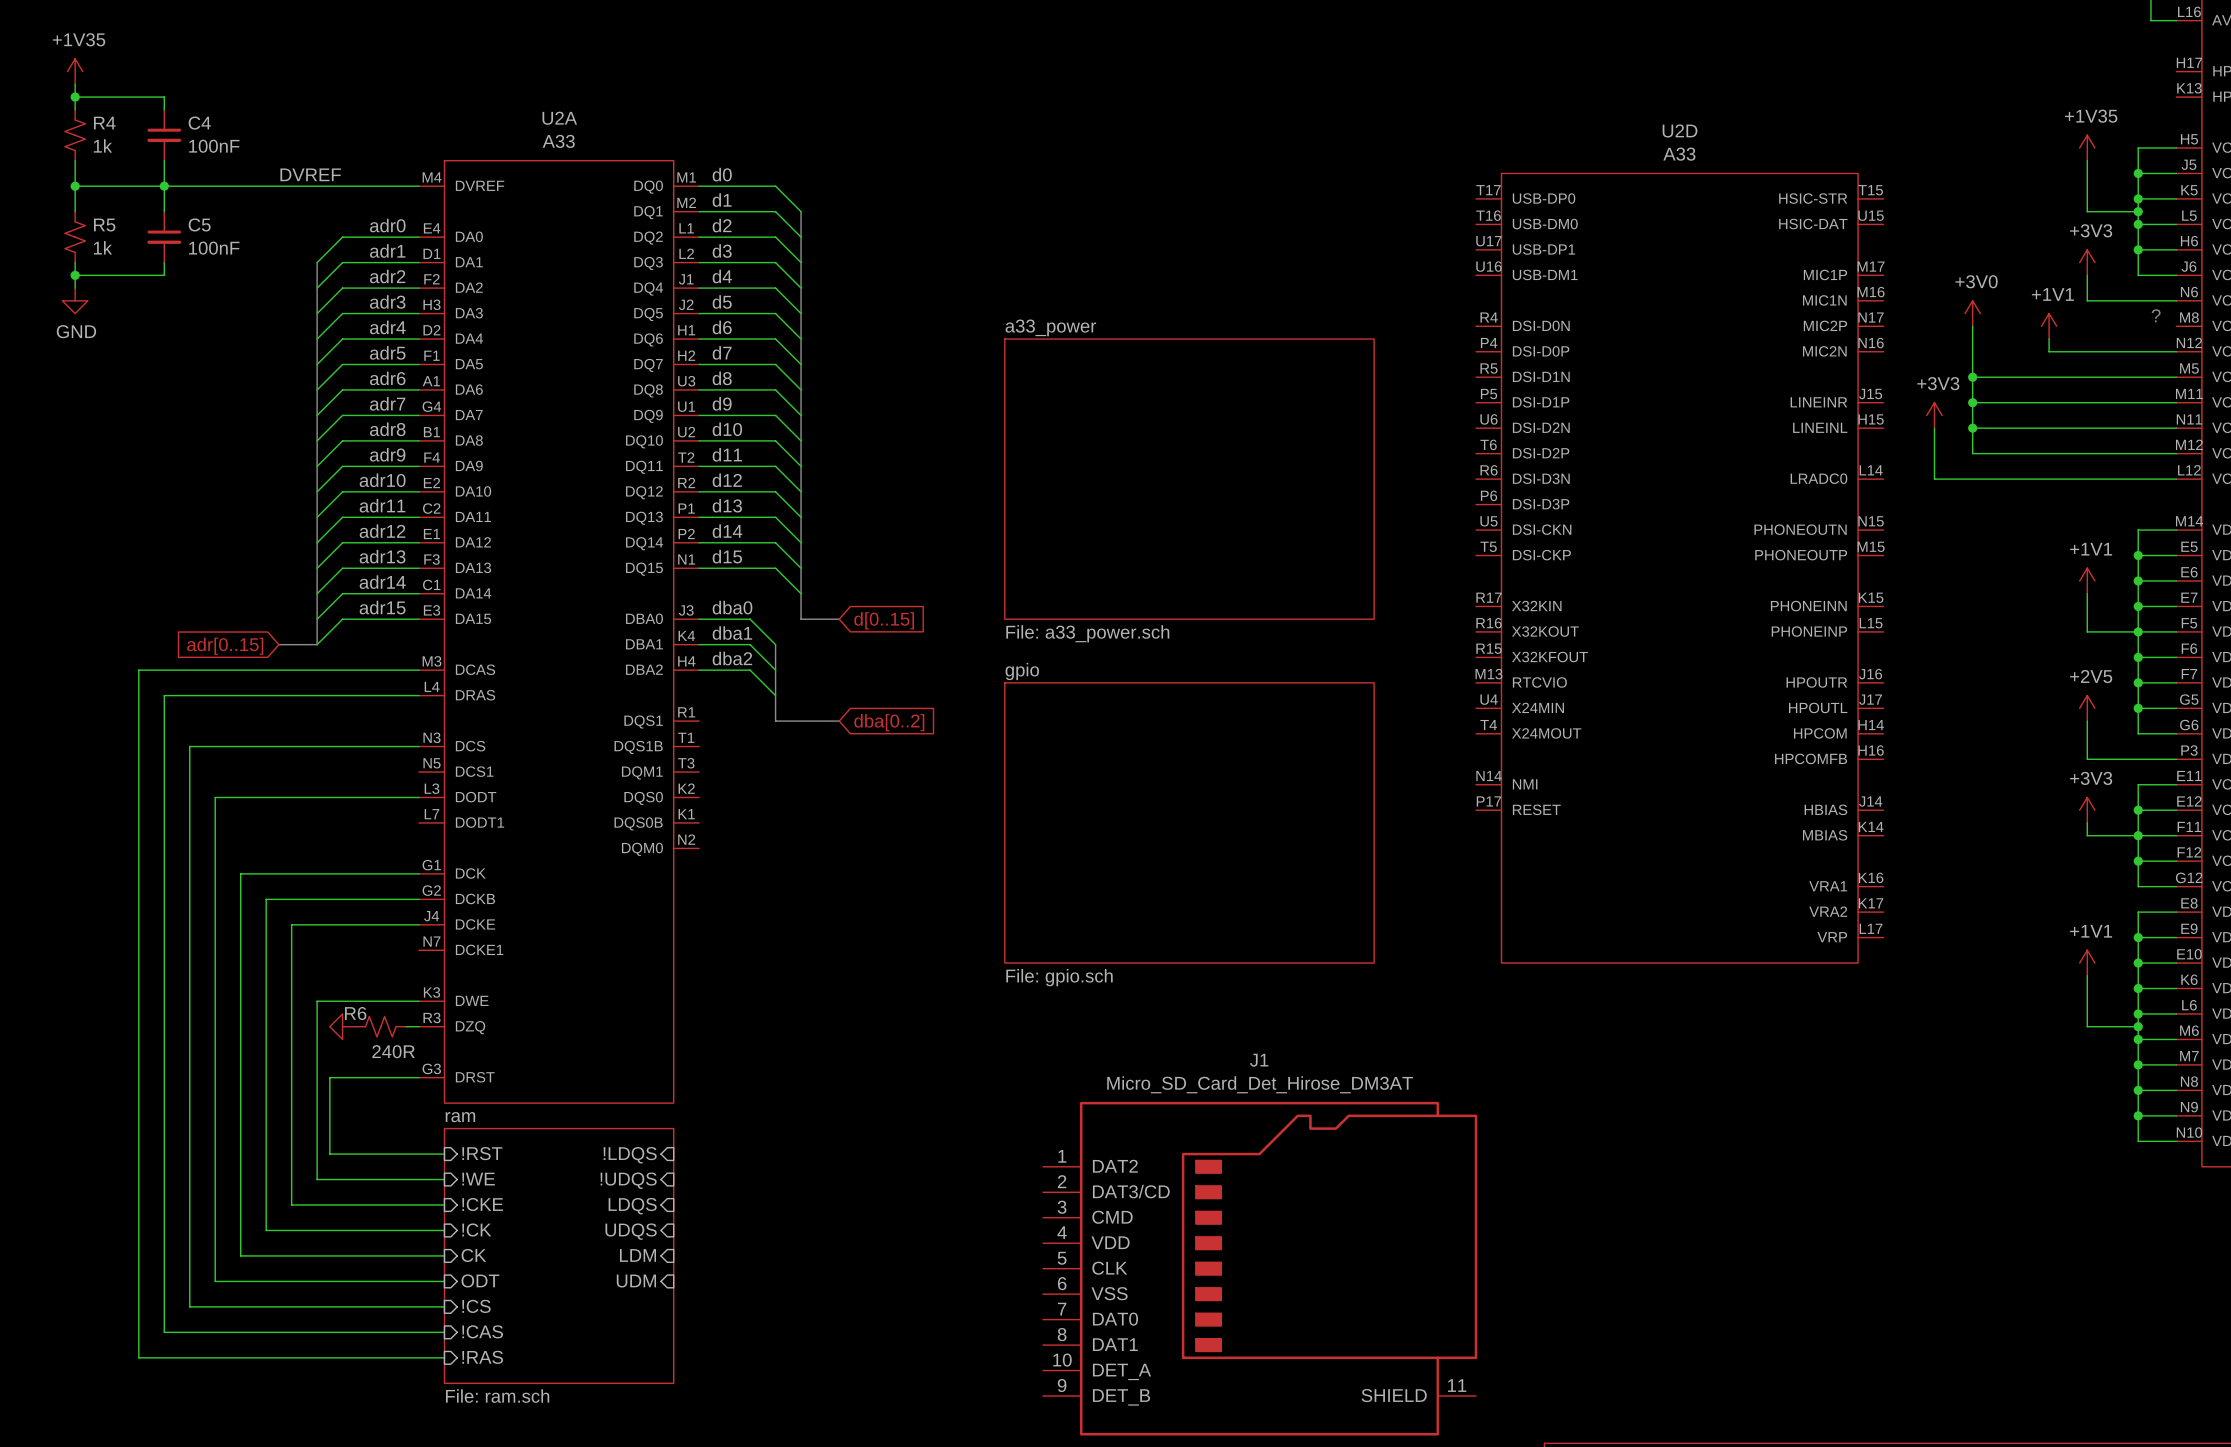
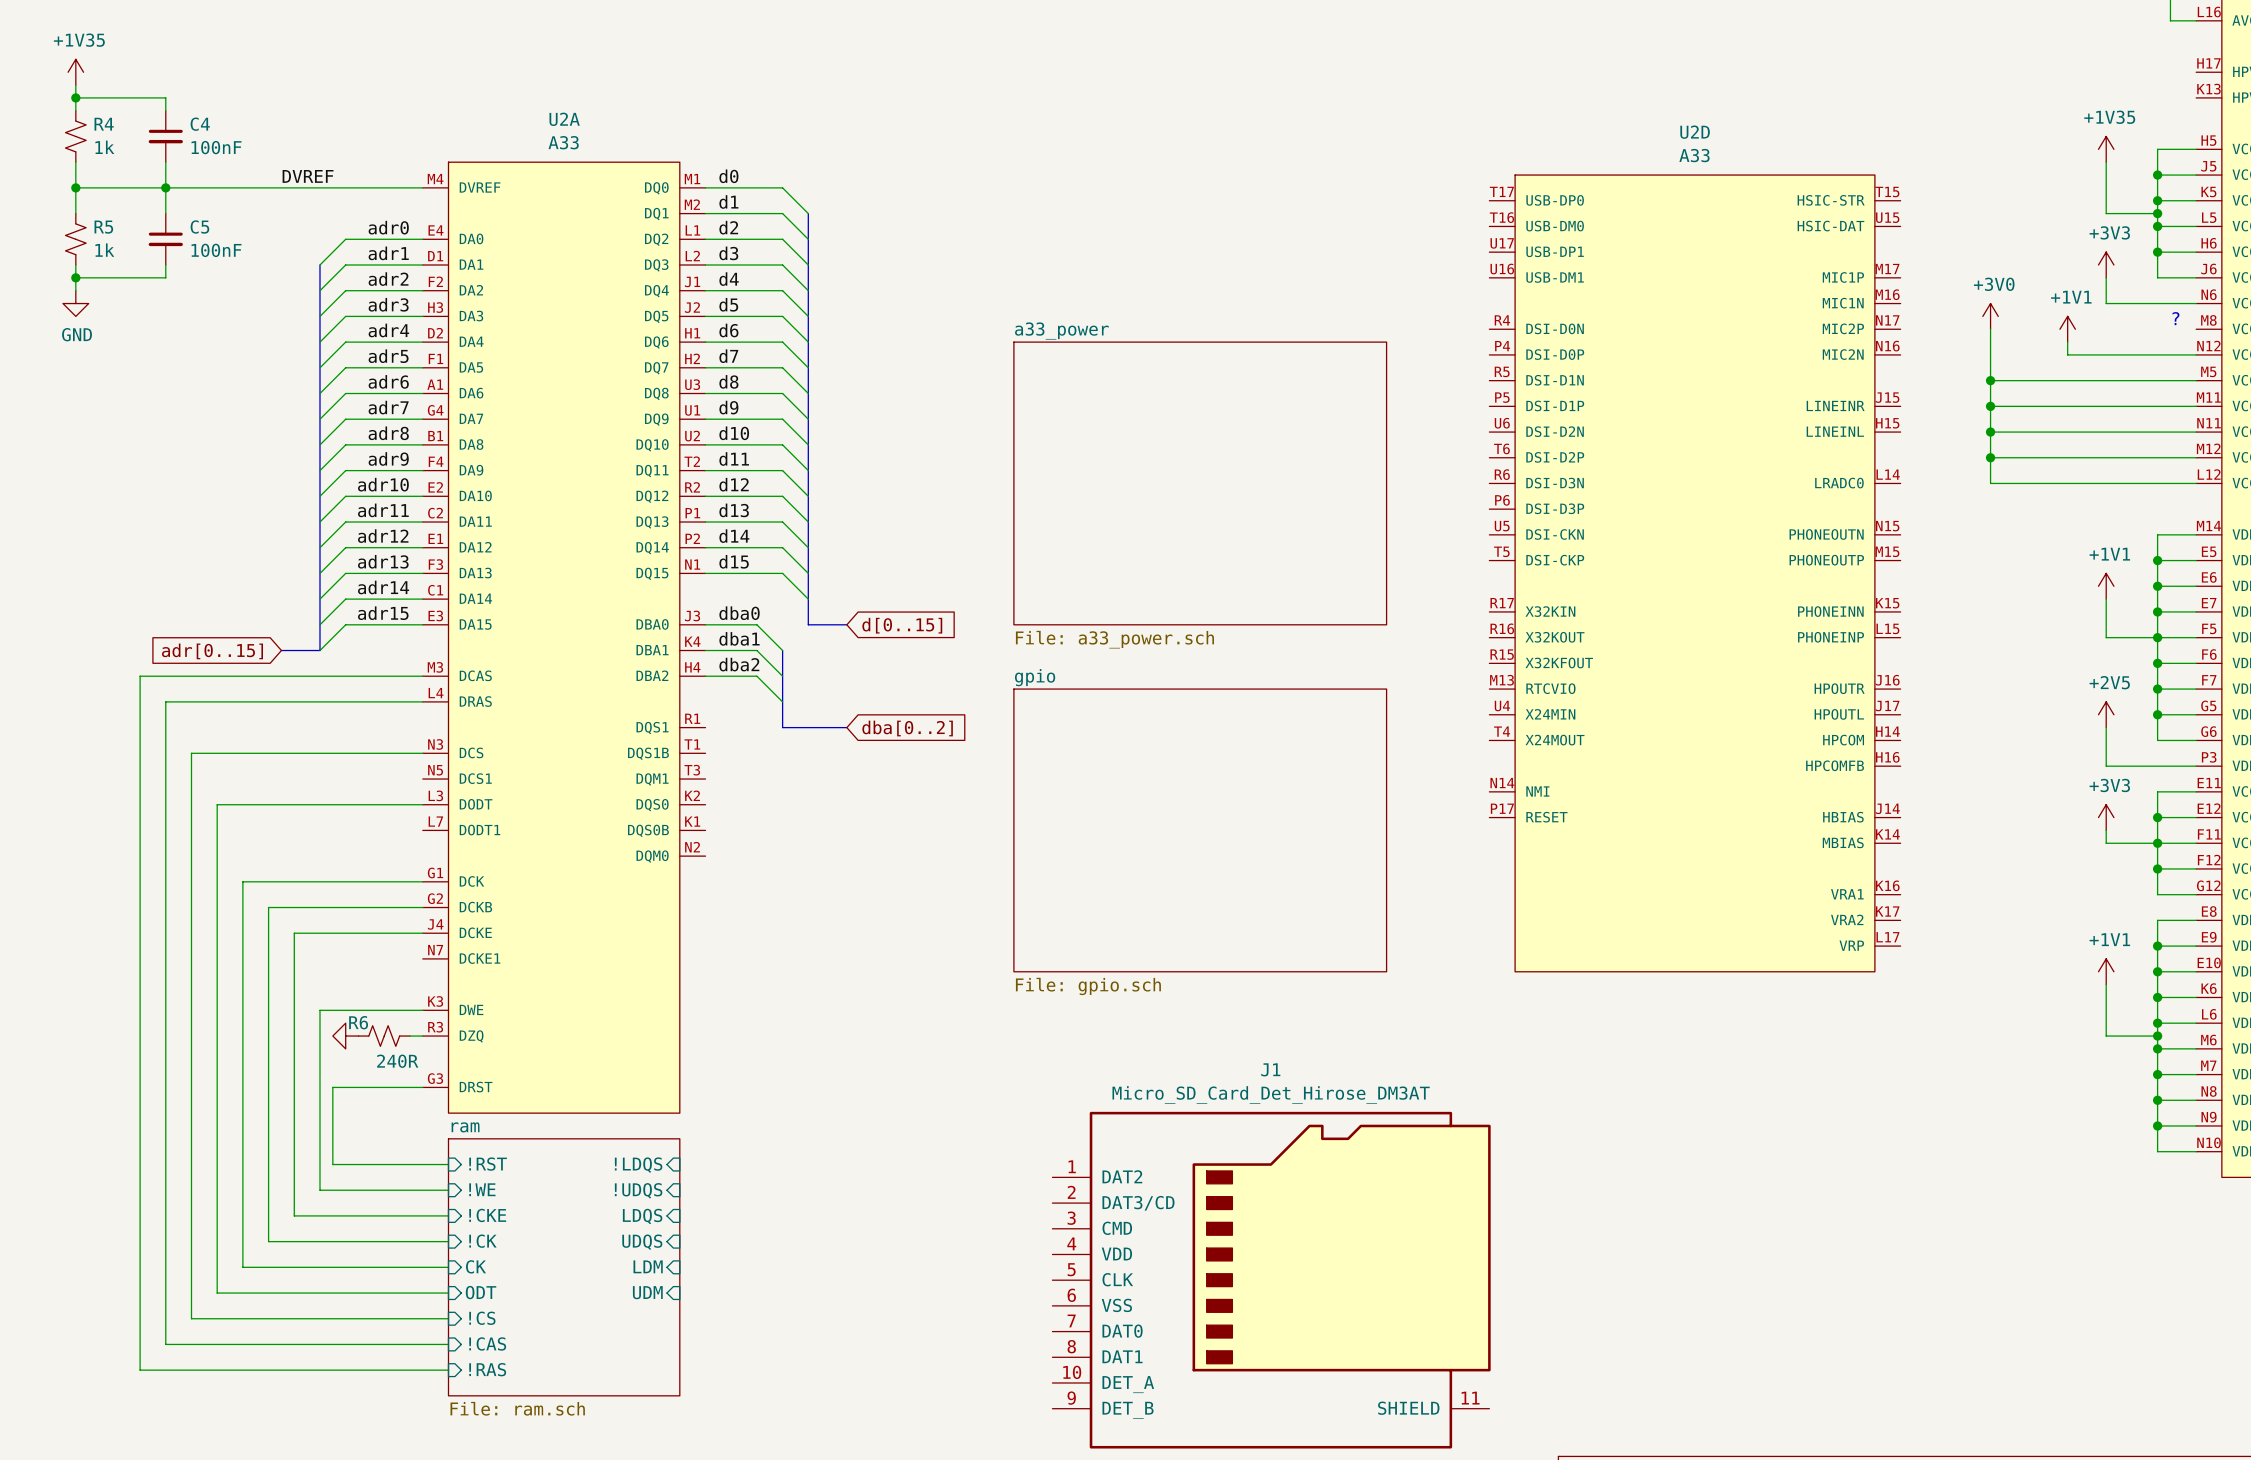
power symbol: +3V3 (1934, 415) -> none
wire: (1934, 428) (1934, 479) (1972, 479) -> (1990, 457) (1990, 483)
junction: none -> (1990, 457)

